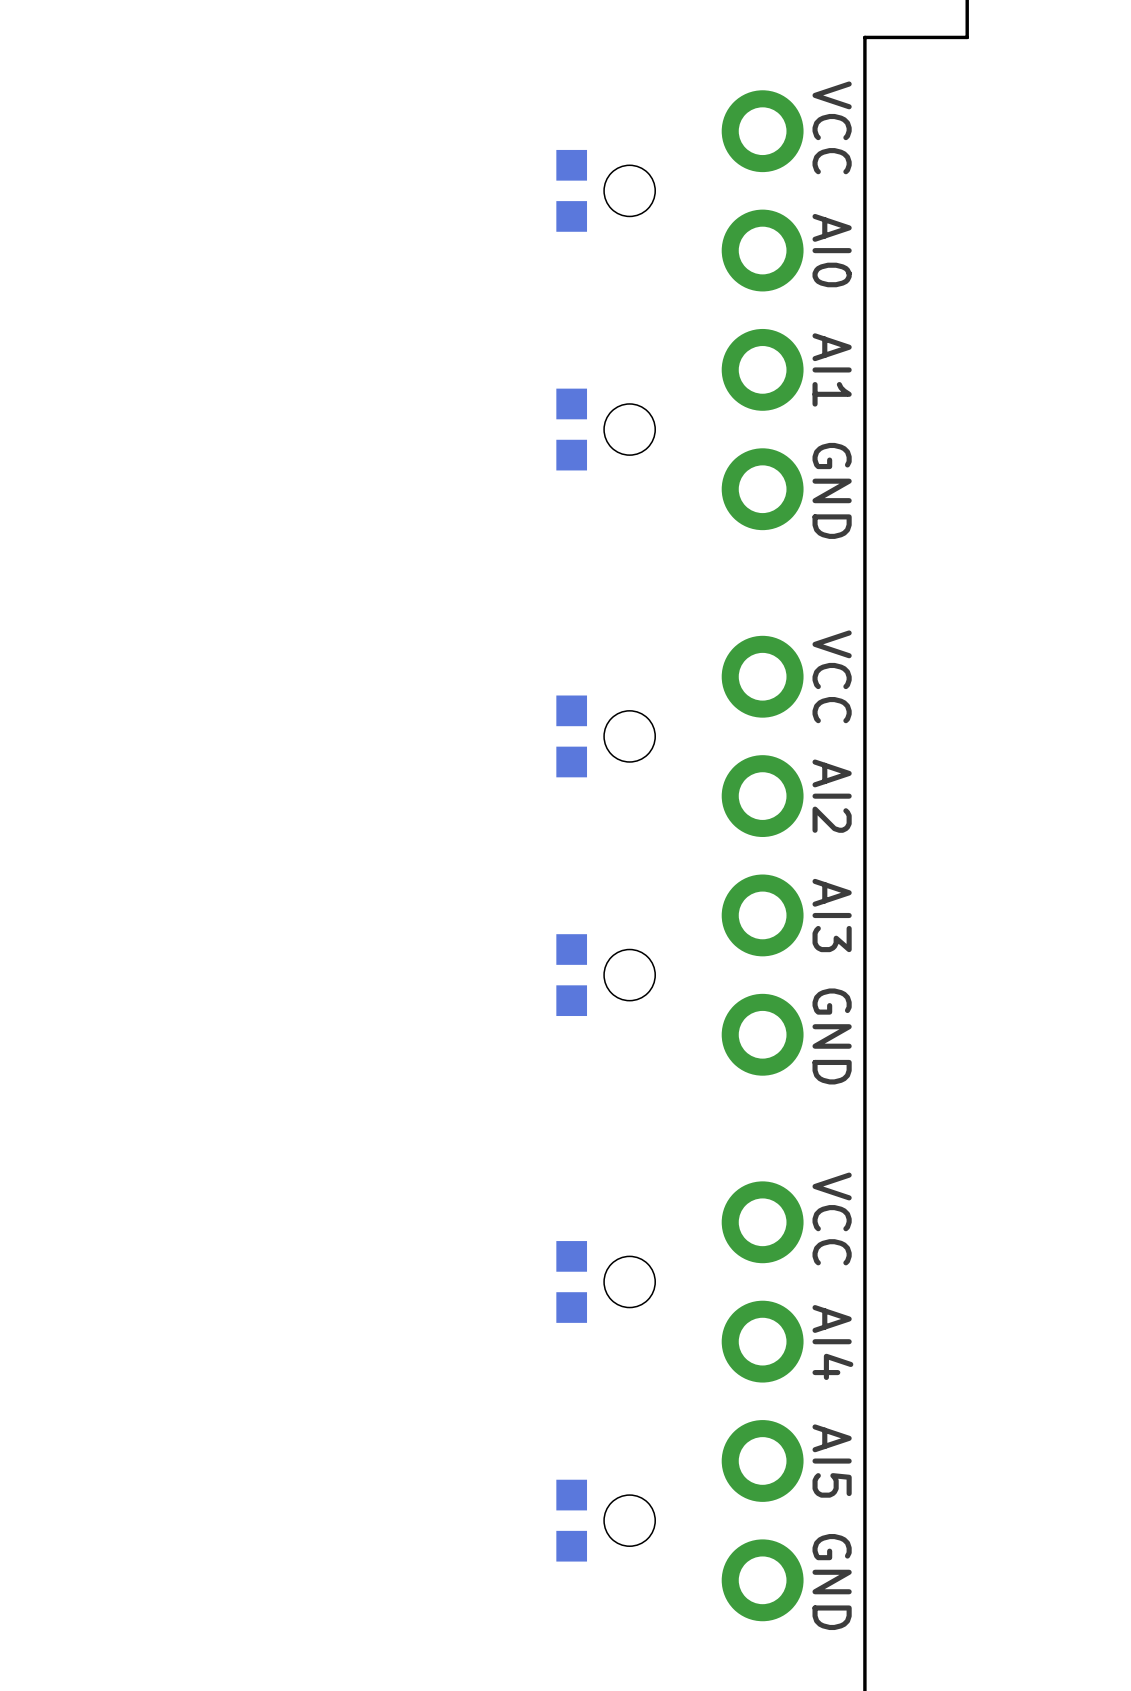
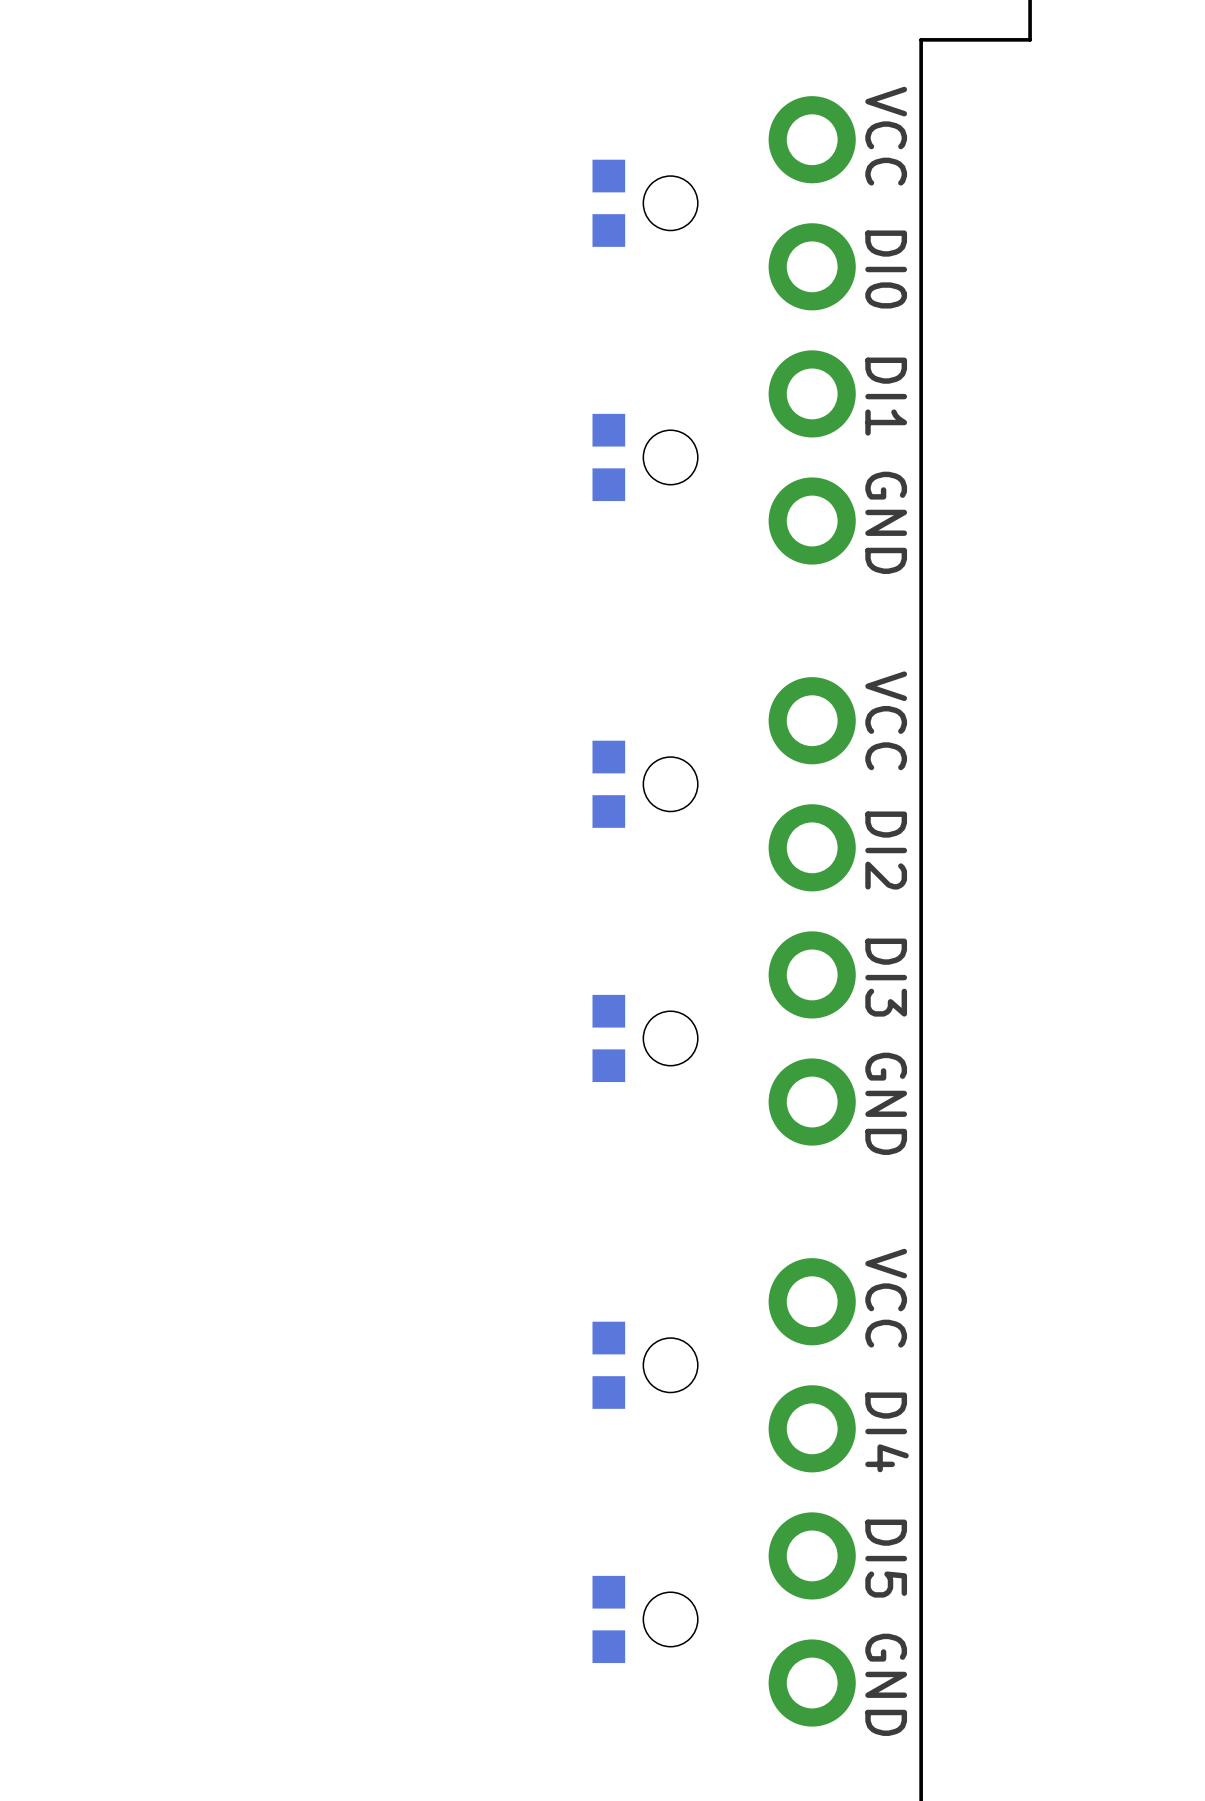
text: AI0 (832, 250) -> DI0 (886, 269)
text: AI1 (832, 369) -> DI1 (886, 396)
text: AI2 (832, 796) -> DI2 (886, 850)
text: AI3 (832, 915) -> DI3 (886, 977)
text: AI4 (832, 1342) -> DI4 (887, 1432)
text: AI5 (832, 1461) -> DI5 (886, 1558)

